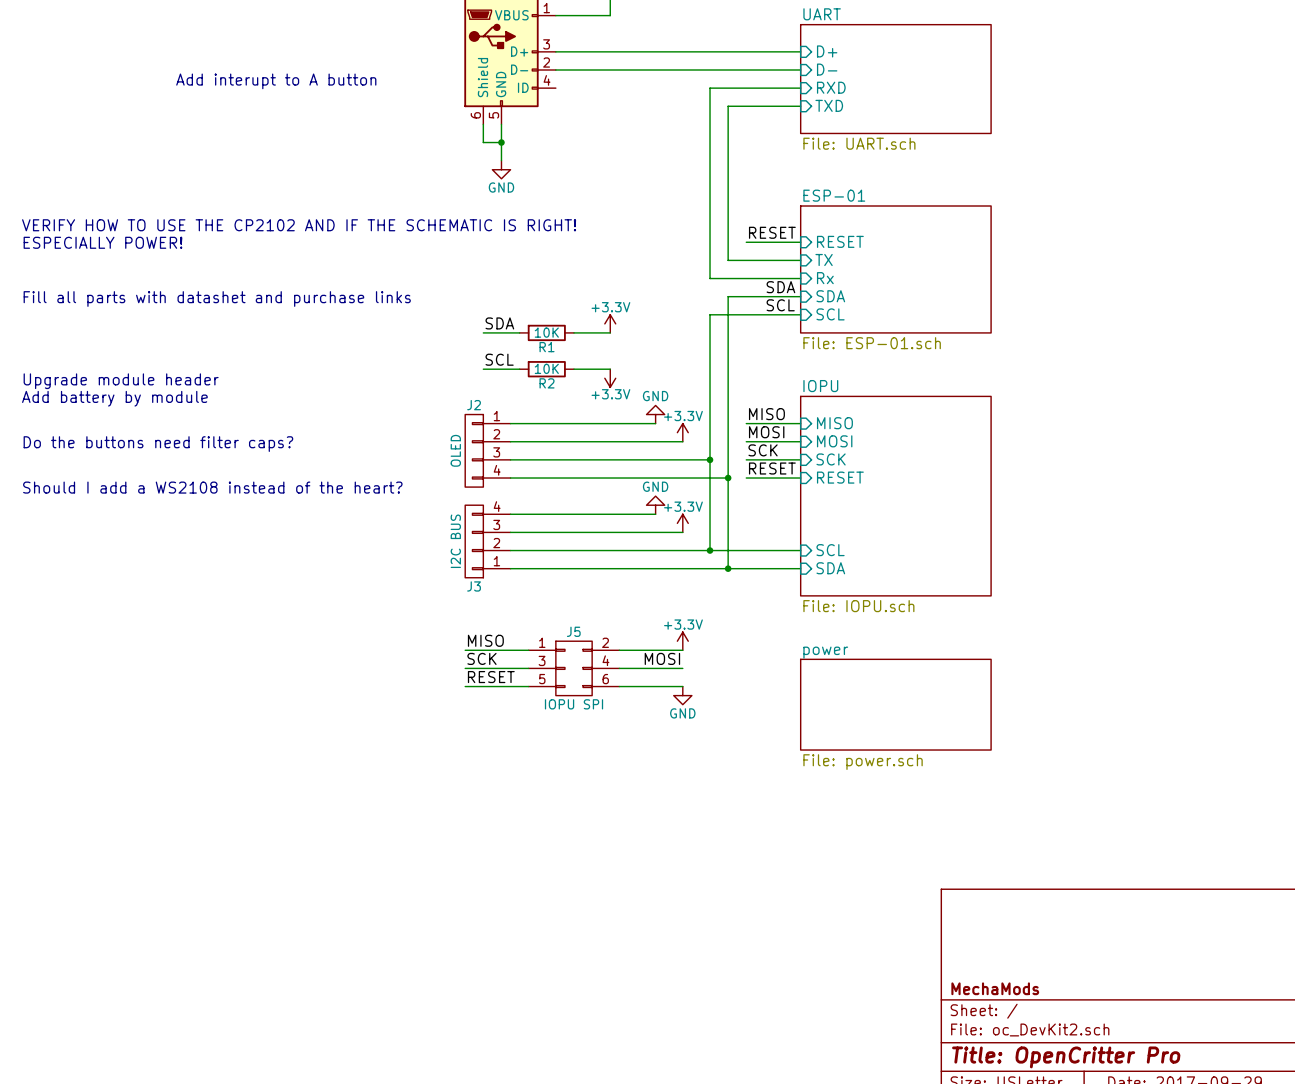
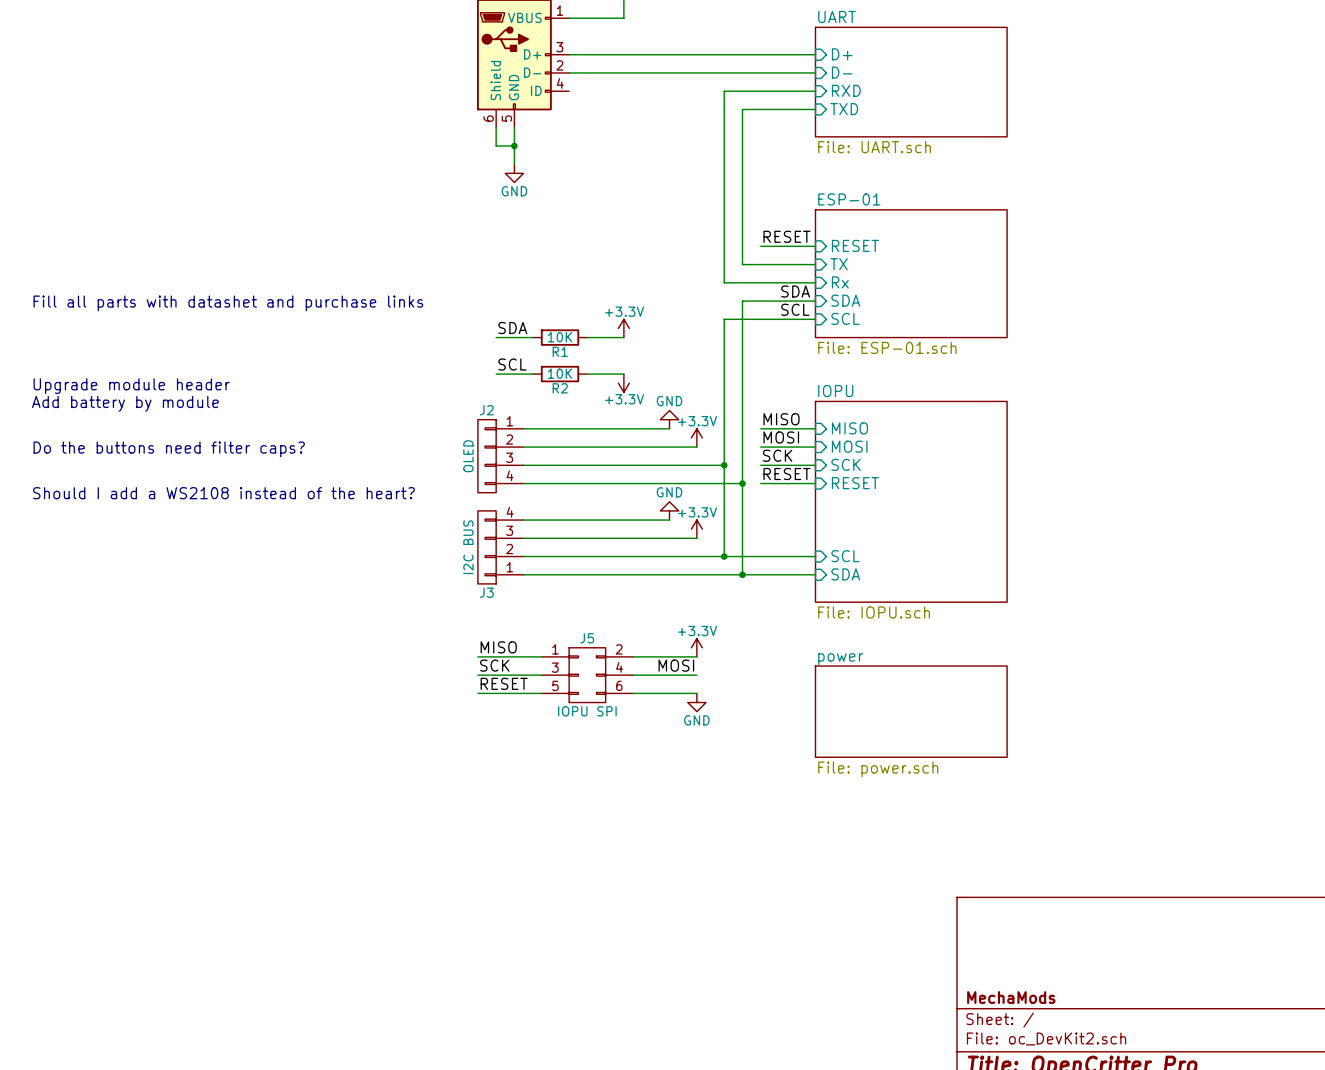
text: Add interupt to A button (276, 81) -> none
text: VERIFY HOW TO USE THE CP2102 AND IF THE SCHEMATIC IS RIGHT! (299, 225) -> none
text: ESPECIALLY POWER! (102, 242) -> none

